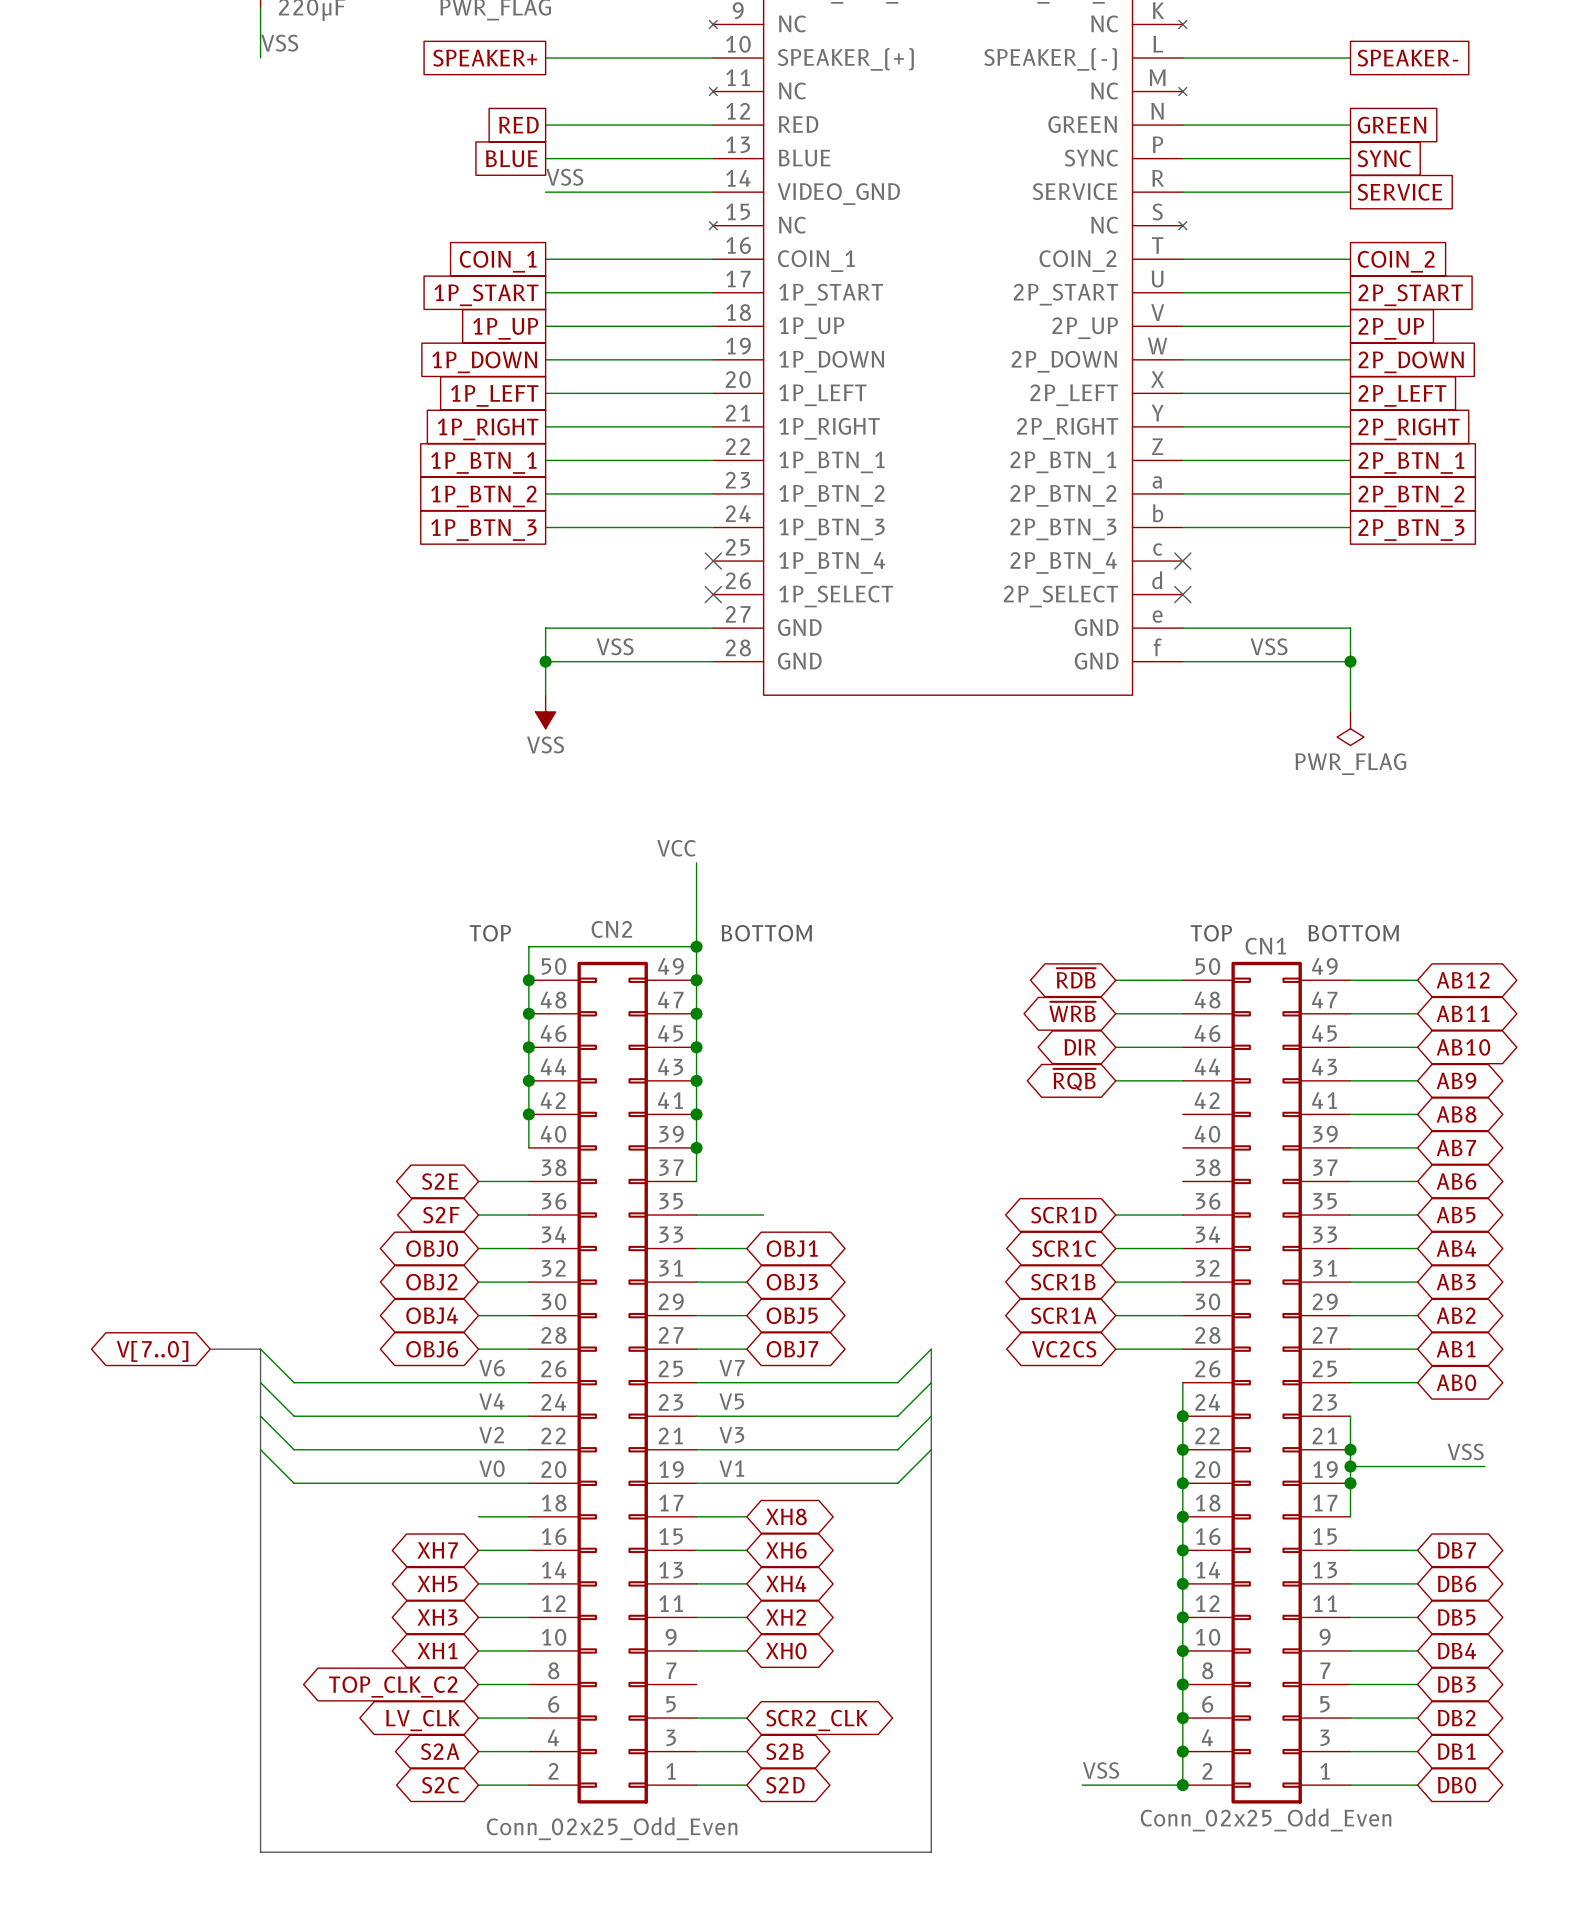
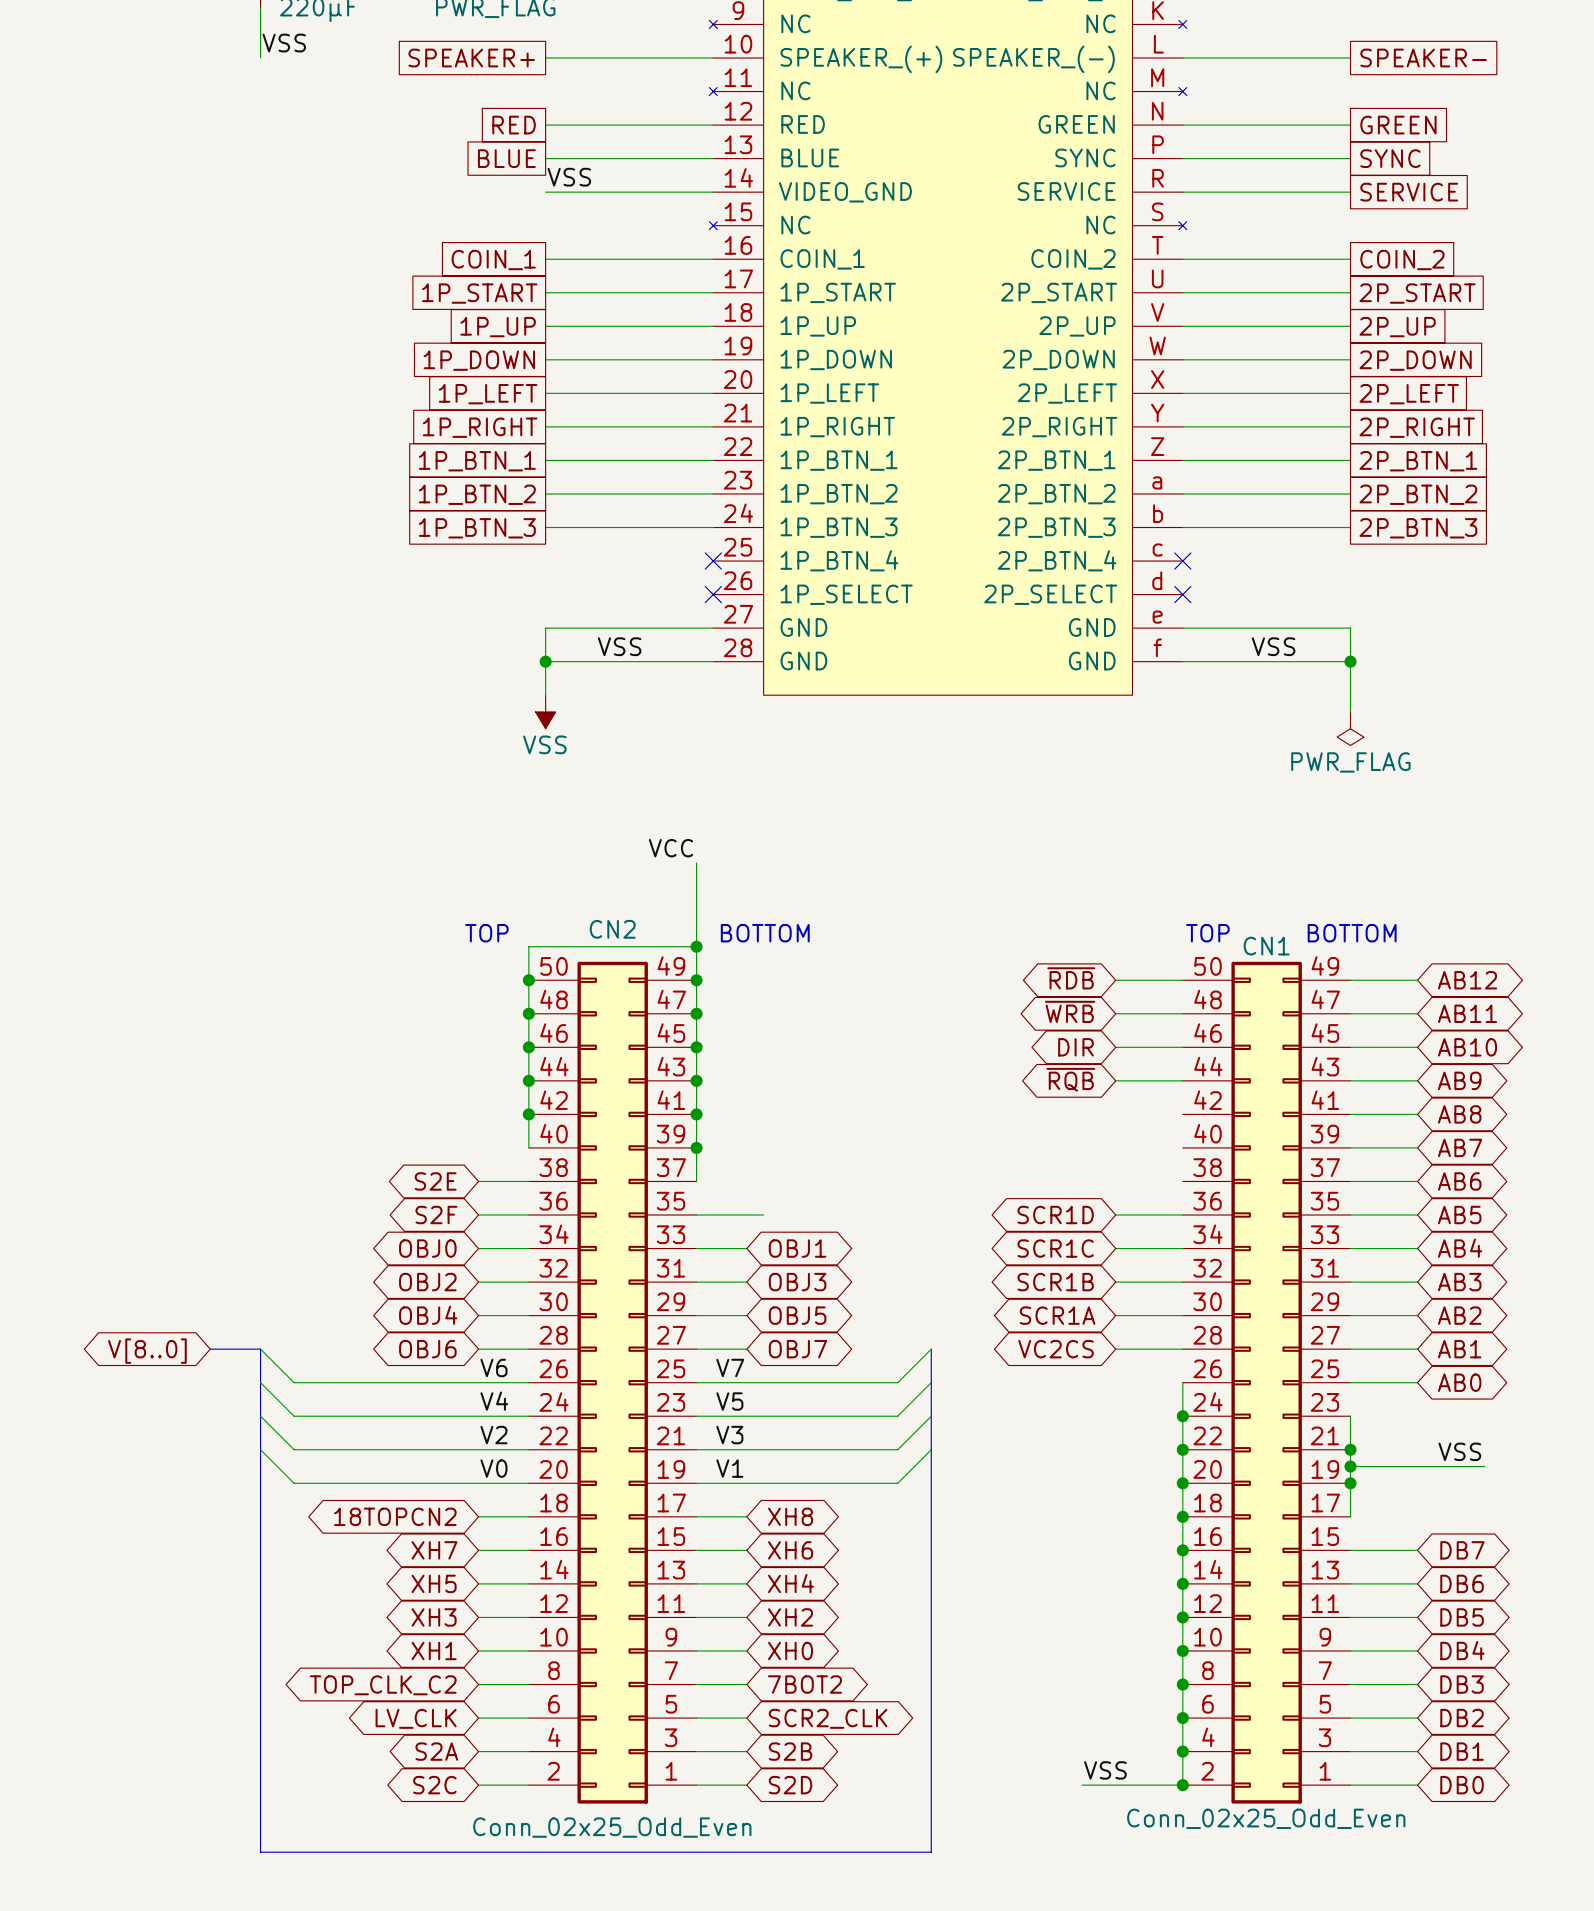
global label: V[7..0] (152, 1351) -> V[8..0] (147, 1351)
global label: none -> 18TOPCN2 (395, 1516)
wire: none -> (696, 1684) (746, 1684)
global label: none -> 7BOT2 (805, 1684)

